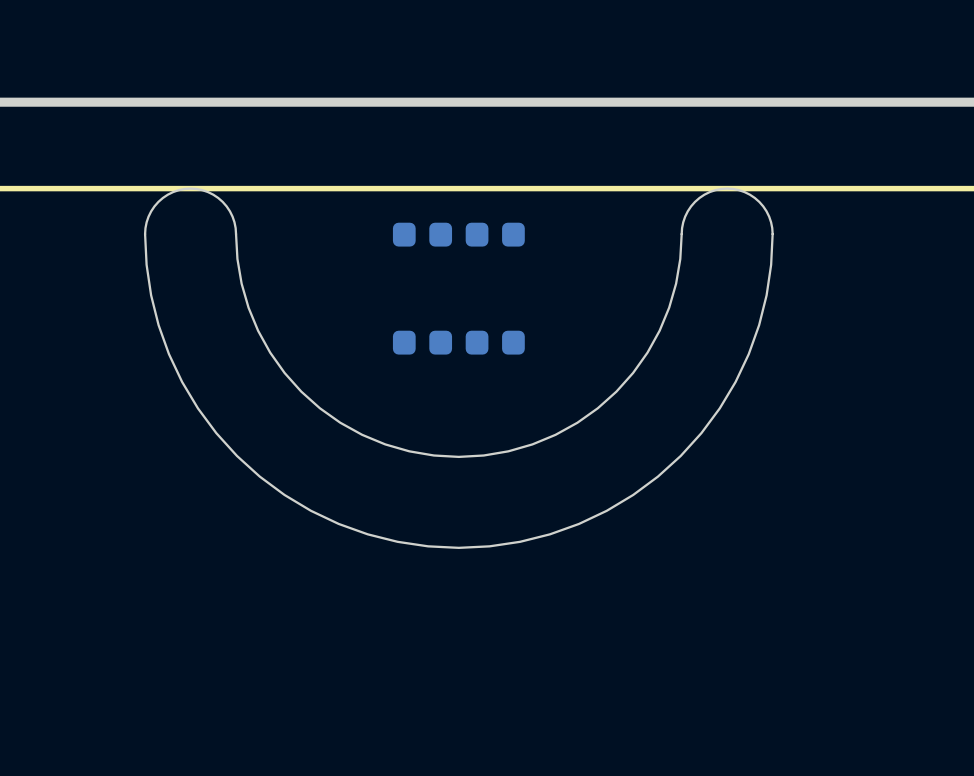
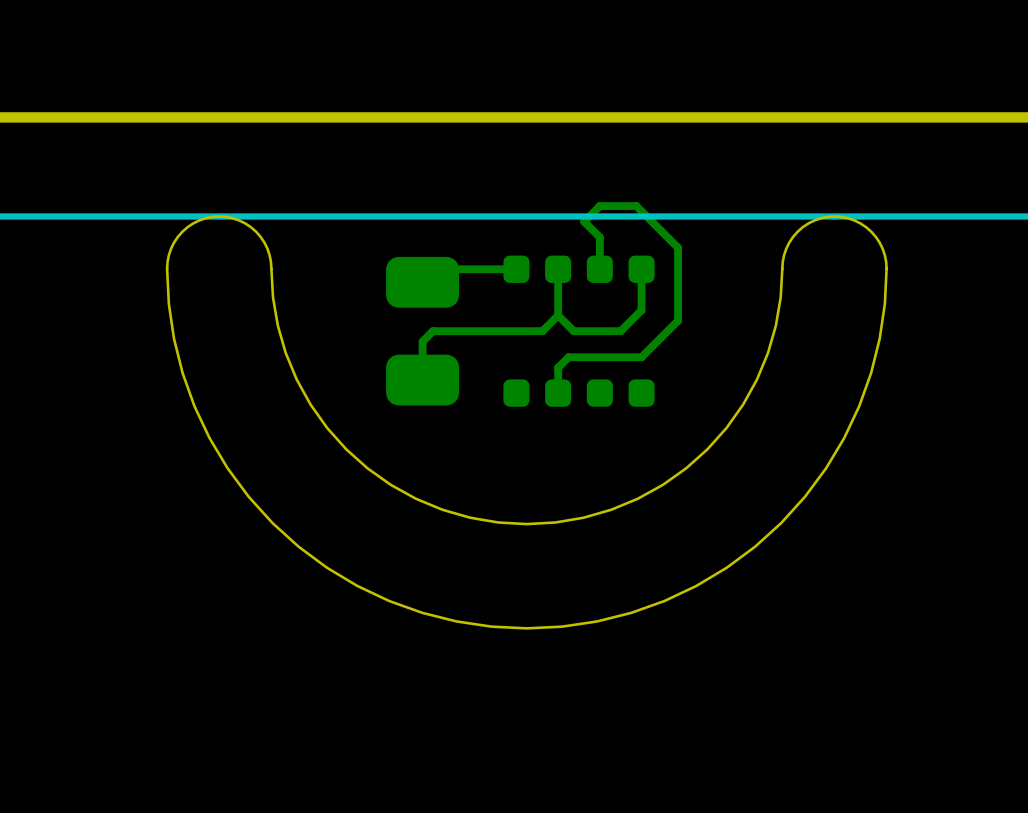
bottom track: none -> (516, 269) (430, 269) (422, 277)
bottom track: none -> (558, 269) (558, 315)
bottom track: none -> (599, 269) (599, 237) (584, 221) (599, 206) (636, 206) (678, 247) (678, 320) (641, 357) (568, 357) (558, 367) (558, 393)
bottom track: none -> (641, 269) (641, 310) (620, 331) (573, 331) (558, 315)
bottom track: none -> (558, 315) (542, 331) (433, 331) (422, 341) (422, 380)
part: none -> (422, 331)
part position: (458, 288) -> (578, 331)

